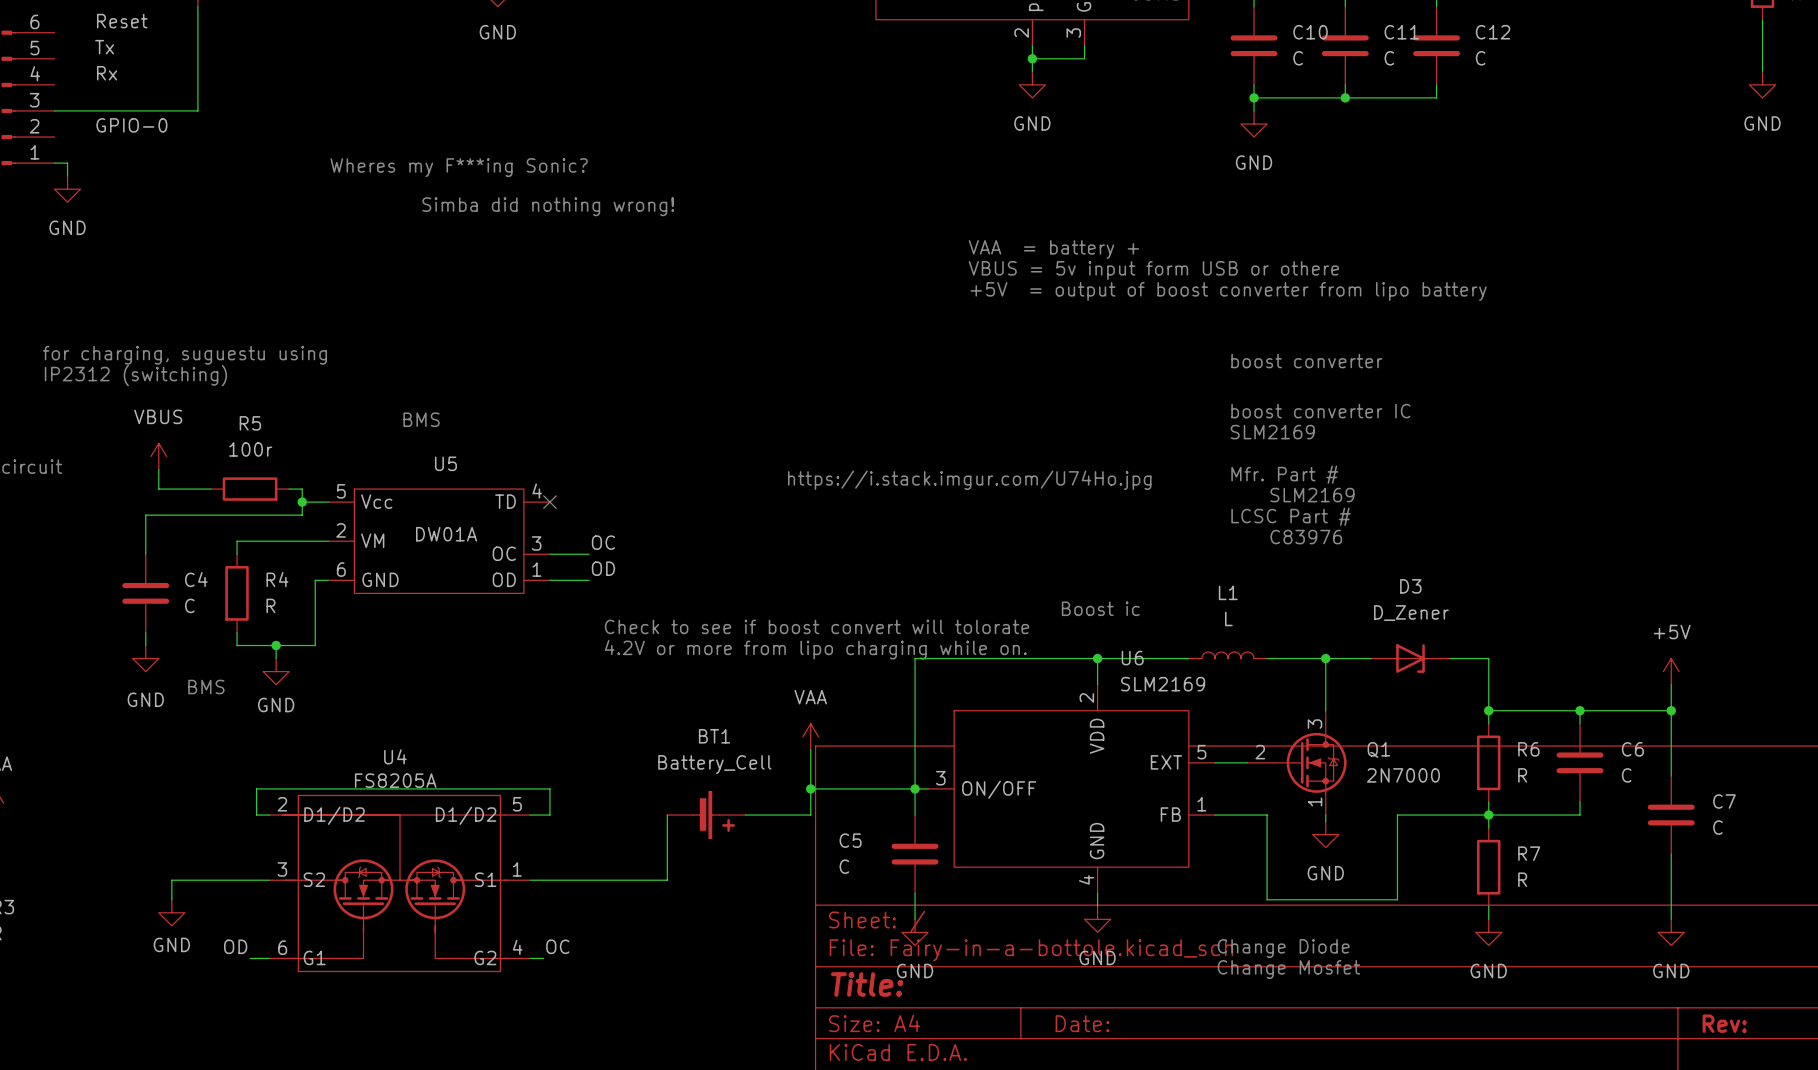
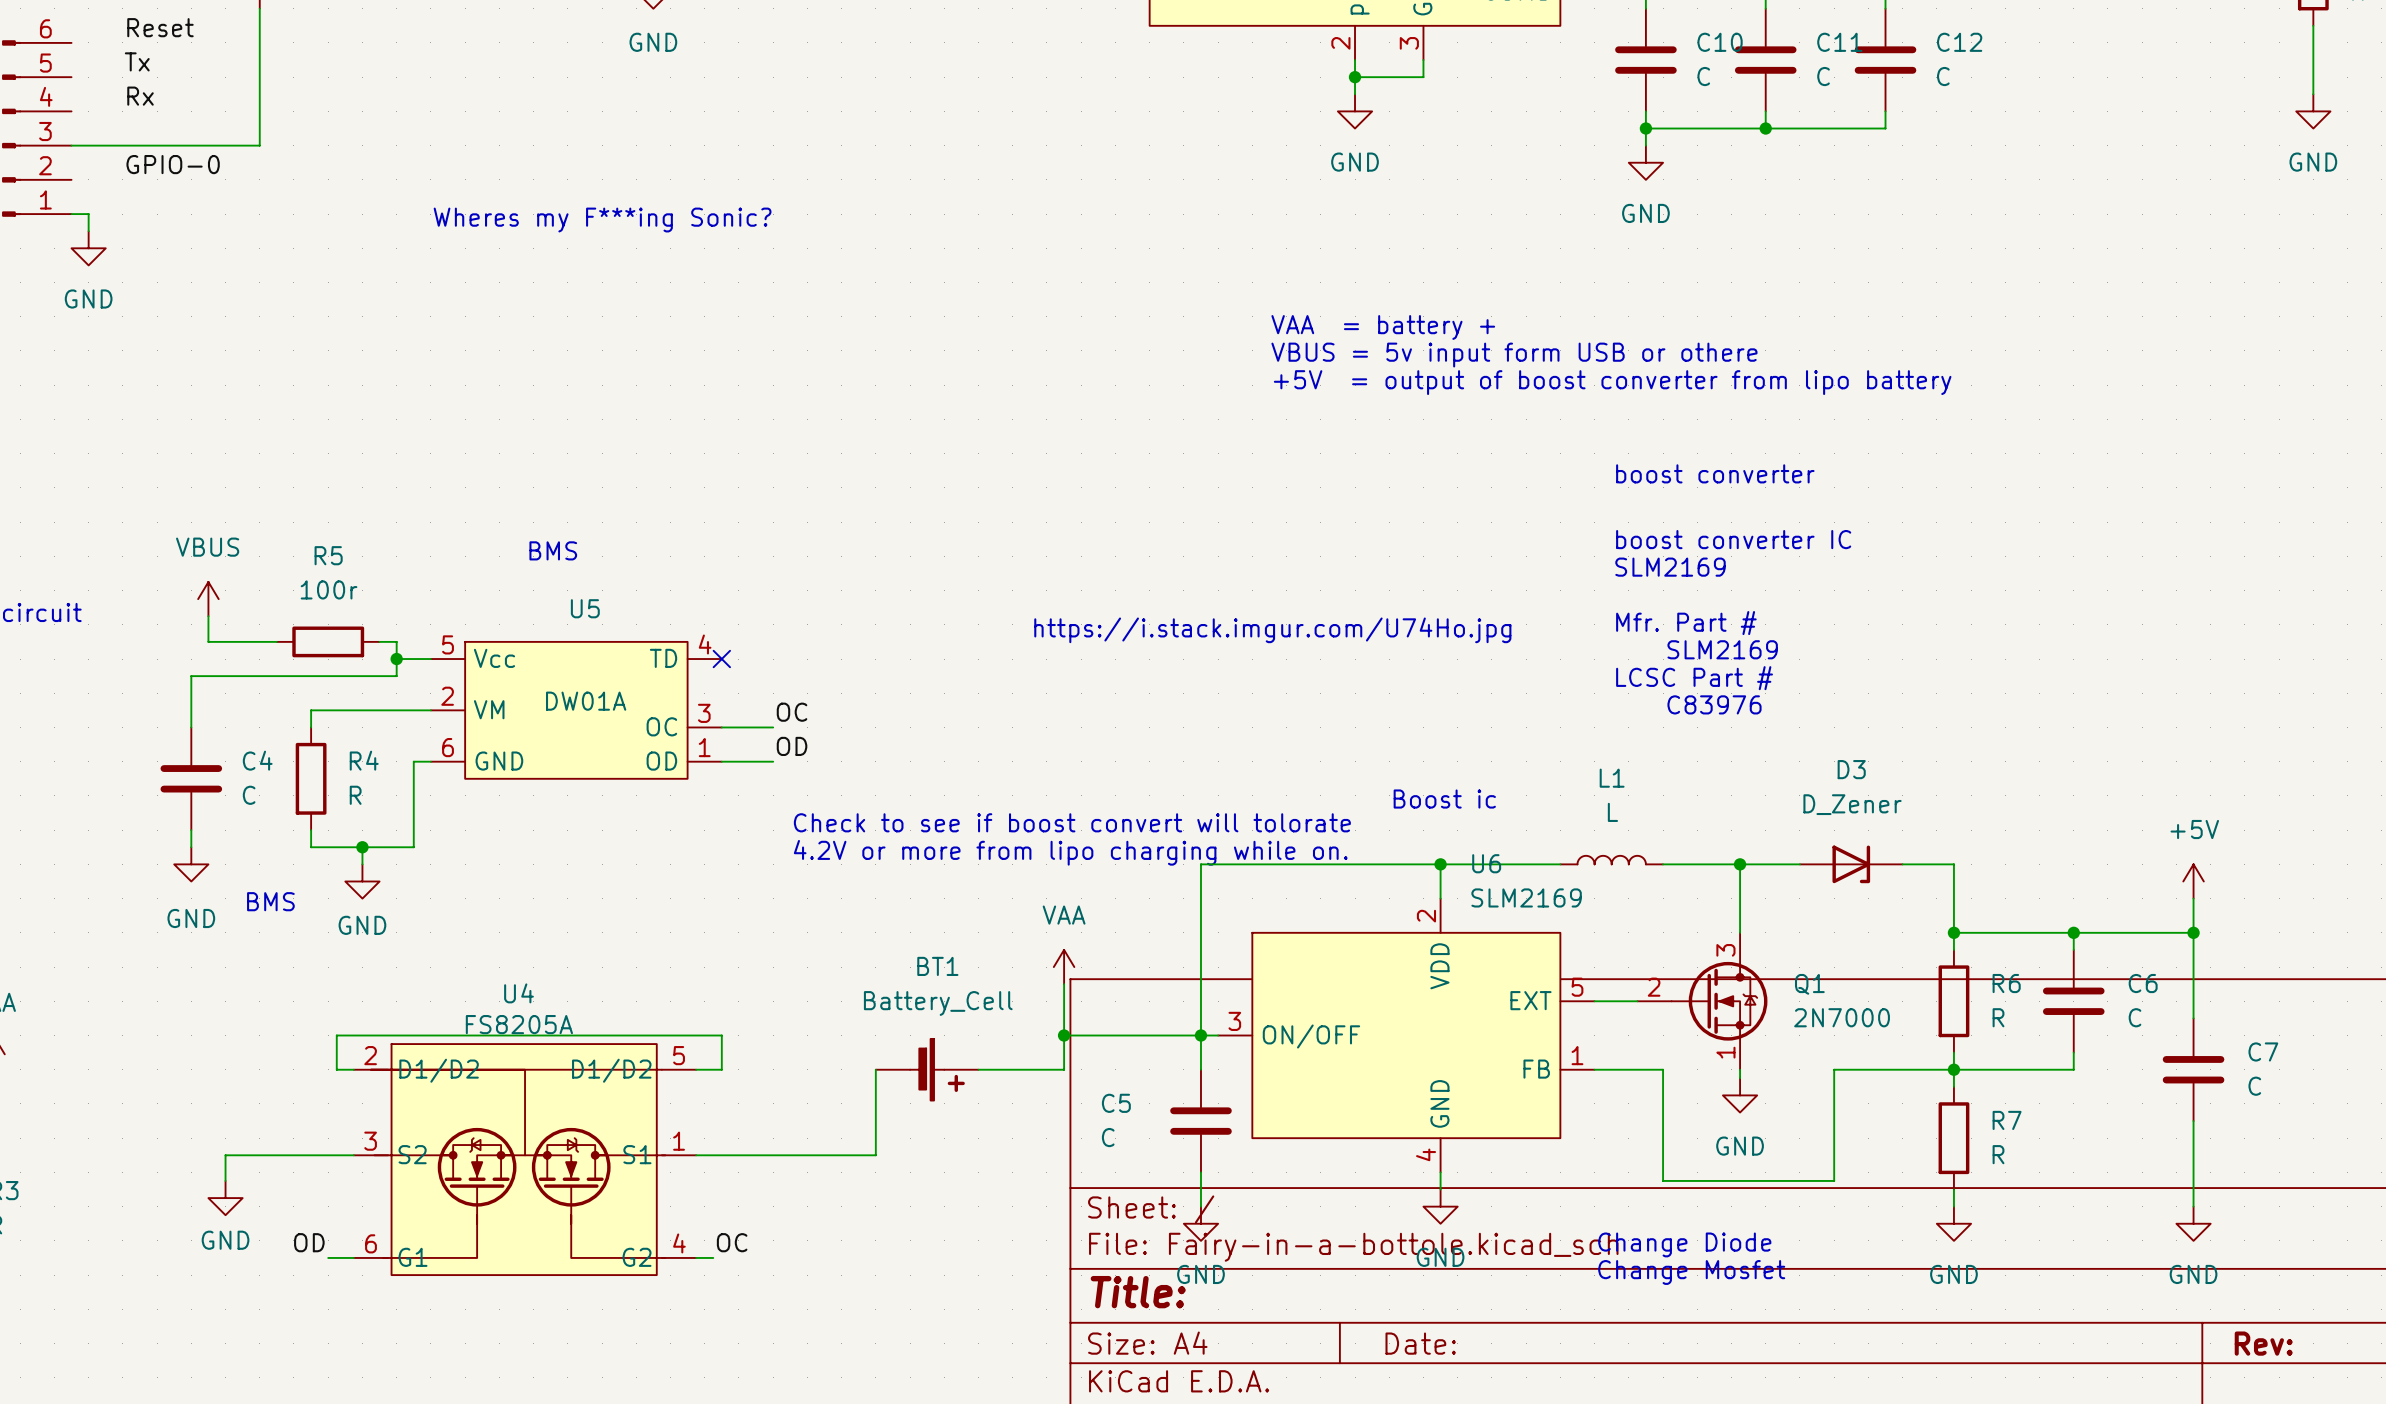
text: Simba did nothing wrong! (548, 206) -> none
text: for charging, suguestu using (184, 355) -> none
text: IP2312 (switching) (135, 375) -> none

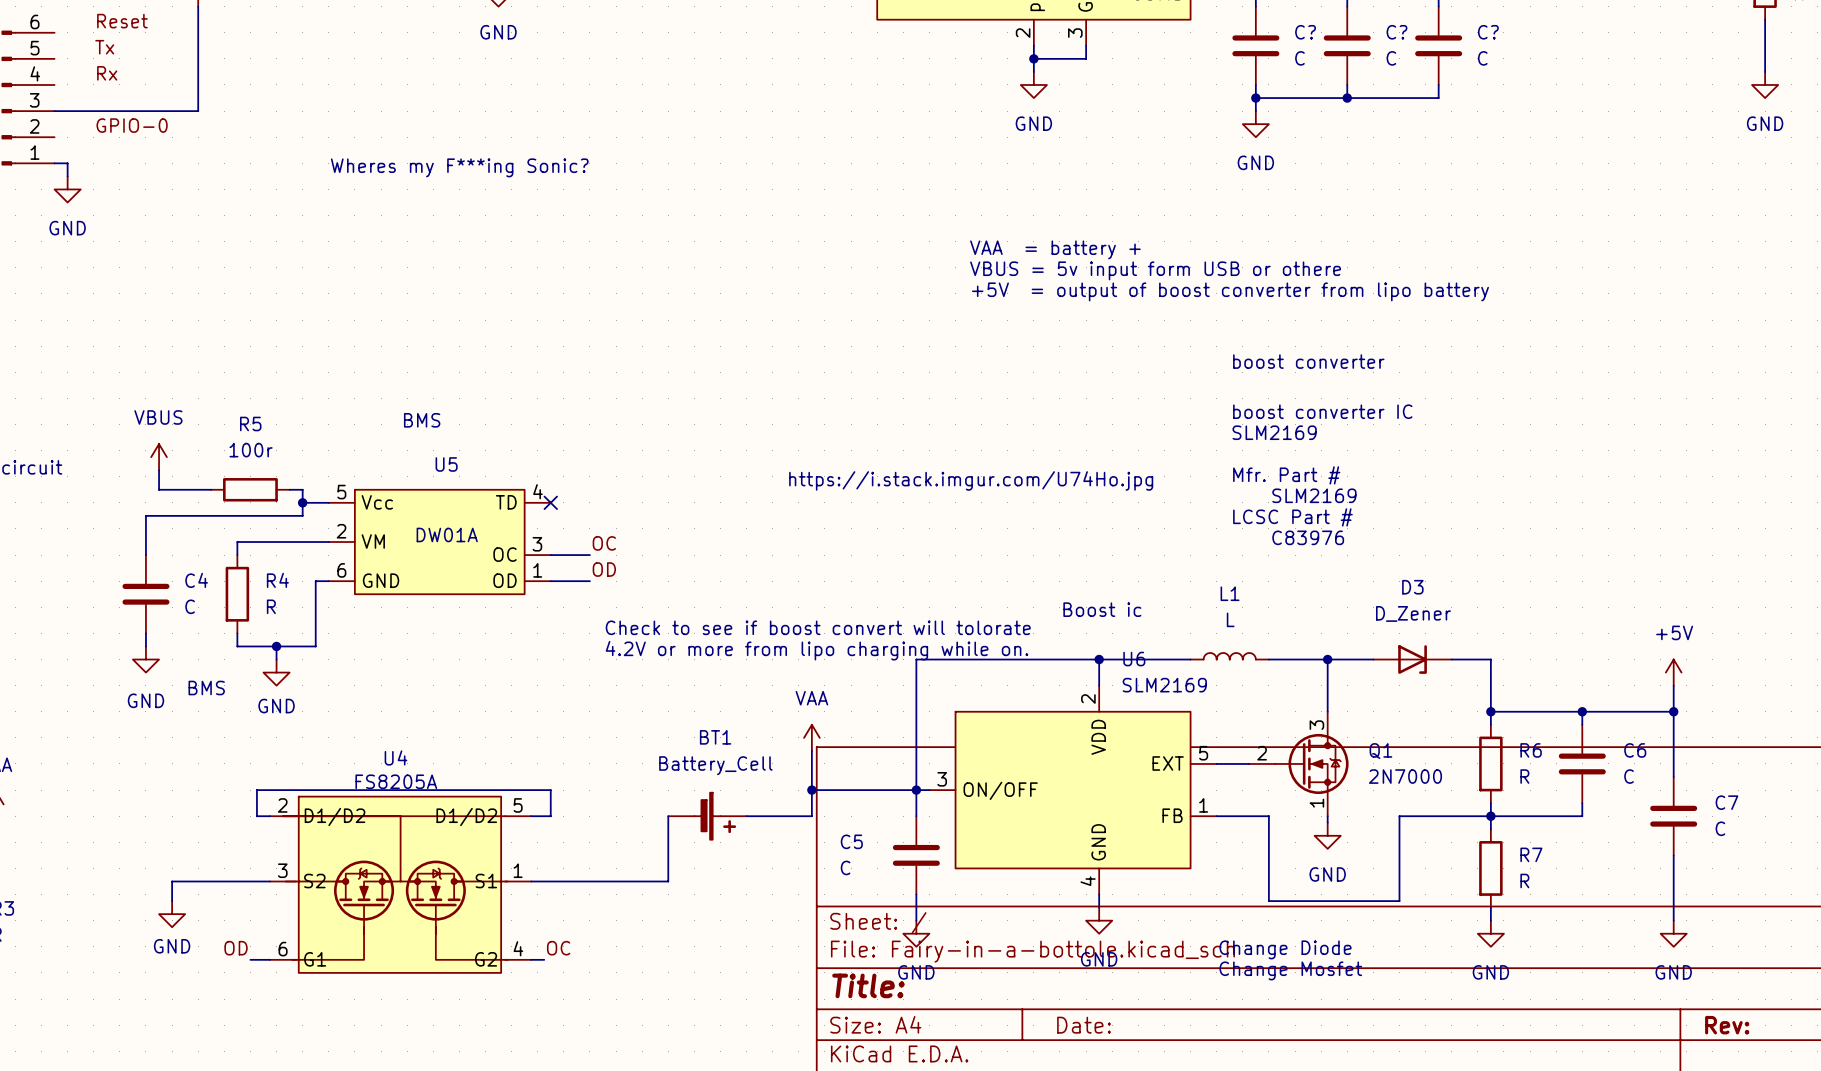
C10 name: C10 (1720, 42) -> C? (1305, 32)
C11 name: C11 (1839, 42) -> C? (1396, 32)
C12 name: C12 (1959, 42) -> C? (1488, 32)

